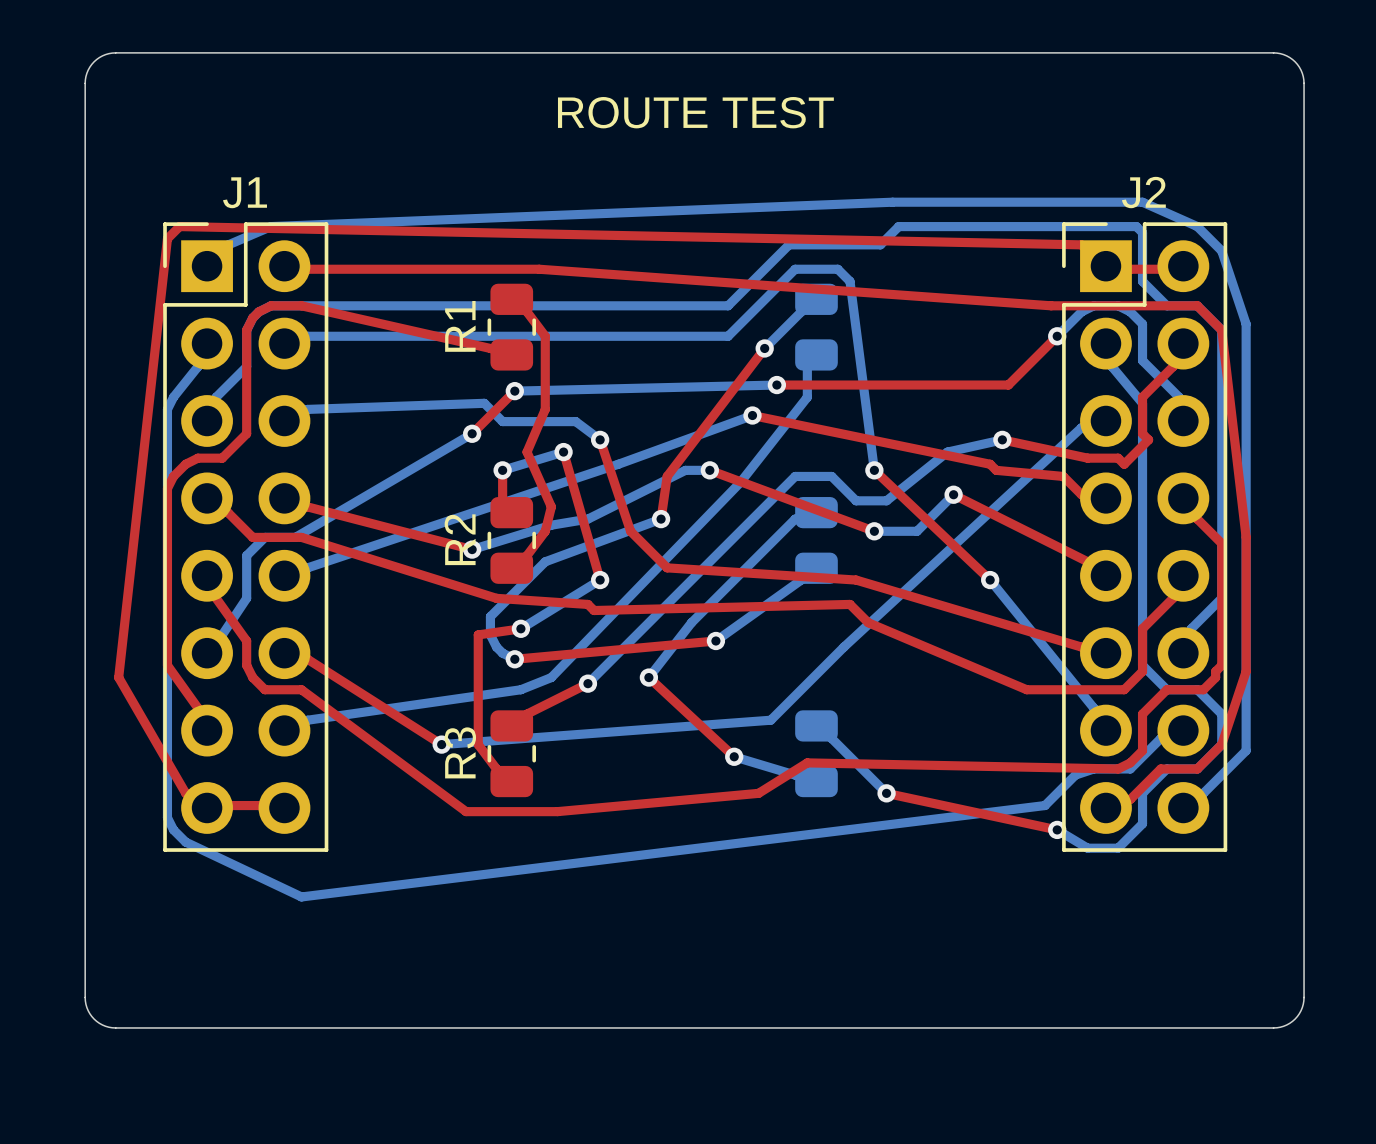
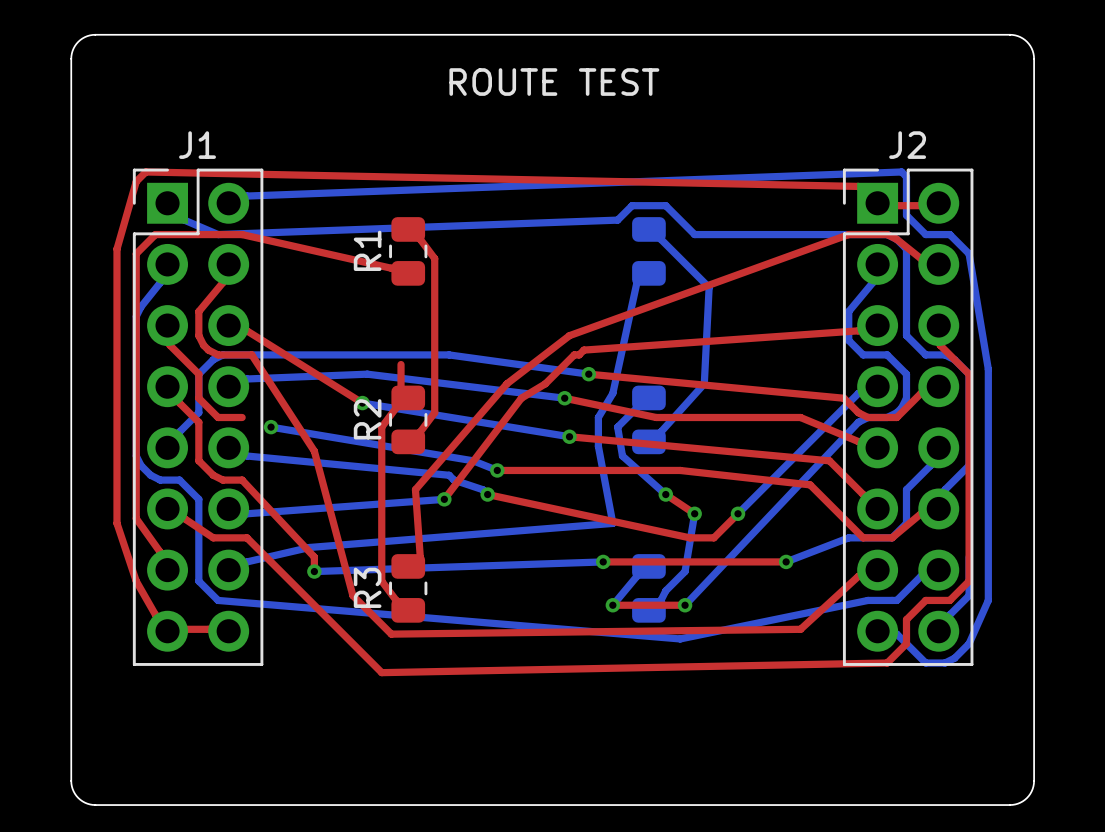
bottom track: (1136, 226) (898, 226) (880, 244) (789, 244) (728, 305) (271, 305) (258, 311) (252, 318) (246, 330) (246, 366) (216, 397) (207, 420) -> (901, 171) (246, 196) (228, 203)
top track: (167, 238) (118, 677) (185, 793) (207, 807) -> (136, 181) (116, 249) (116, 523) (136, 581) (155, 614) (167, 631)
bottom track: (207, 266) (228, 244) (271, 226) (892, 202) (1142, 202) (1197, 226) (1221, 250) (1246, 324) (1246, 476) -> none
top track: (284, 266) (307, 269) (539, 269) (1069, 305) -> (420, 557) (415, 489) (506, 383) (569, 335) (848, 234)
bottom track: (850, 281) (874, 470) -> none
bottom track: (776, 287) (728, 336) (307, 336) (284, 343) -> (617, 220) (218, 234) (184, 220) (167, 203)
bottom track: (816, 299) (764, 348) -> (648, 229) (709, 287) (704, 383) (660, 431) (648, 441)
top track: (271, 305) (258, 311) (252, 318) (246, 330) (246, 403) -> (228, 264) (222, 282) (198, 311)
bottom track: (1093, 305) (1081, 311) (1057, 336) -> (867, 234) (694, 234) (675, 215)
top track: (1118, 305) (1197, 305) (1221, 330) (1246, 537) (1246, 671) (1221, 744) -> (969, 518) (969, 581)
bottom track: (1221, 330) (1221, 482) -> (969, 253) (988, 369)
top track: (1057, 336) (1008, 385) (776, 385) -> none
via: (1057, 336) -> none
bottom track: (1105, 343) (1112, 366) (1142, 403) -> (906, 277) (906, 311)
bottom track: none -> (877, 264) (872, 282) (848, 311) (848, 340) (863, 354) (887, 354) (906, 374)
top track: (1183, 343) (1173, 366) (1142, 397) (1142, 433) (1148, 439) (1124, 464) (1118, 458) (1087, 458) (1002, 439) -> (938, 264) (920, 258) (896, 239) (887, 234)
top track: (764, 348) (667, 476) (661, 519) -> none
via: (764, 348) -> none
bottom track: (816, 354) (807, 366) (807, 397) (740, 482) (551, 677) (520, 689) (307, 720) -> (648, 273) (636, 282) (612, 393) (598, 417) (598, 446) (612, 523) (309, 547) (246, 561)
bottom track: (1142, 360) (1179, 397) (1183, 420) -> none
bottom track: (776, 385) (514, 391) -> none
via: (776, 385) -> none
top track: (514, 391) (472, 433) -> none
via: (514, 391) -> none
top track: (545, 409) (527, 452) (551, 506) (545, 531) -> (434, 316) (434, 412)
top track: (752, 415) (990, 464) (996, 470) (1063, 476) (1081, 494) (1105, 498) -> none
bottom track: (752, 415) (618, 464) (284, 575) -> (487, 494) (482, 489) (453, 480) (449, 475) (246, 456) (228, 447)
via: (752, 415) -> none
top track: none -> (228, 325) (246, 330) (362, 403)
bottom track: (284, 420) (307, 409) (484, 403) (502, 421) (575, 421) (600, 439) -> none
top track: none -> (877, 325) (858, 330) (583, 350) (579, 354) (574, 354) (545, 383) (521, 398) (444, 499)
bottom track: (1105, 420) (1081, 427) (843, 647) (770, 720) (441, 744) -> none
top track: (246, 433) (222, 458) (197, 458) (185, 464) (173, 476) (167, 488) -> (218, 234) (155, 234) (136, 253) (136, 378)
top track: none -> (198, 335) (203, 345) (218, 354) (251, 354) (314, 451) (352, 595) (391, 634) (800, 629) (858, 576) (877, 570)
bottom track: (472, 433) (295, 537) (264, 537) (246, 555) (246, 598) (222, 634) (207, 653) -> none
via: (472, 433) -> none
bottom track: (1142, 433) (1142, 482) -> (906, 335) (925, 354) (945, 354) (954, 359) (969, 374)
top track: (600, 439) (630, 531) (667, 567) (856, 580) (1105, 653) -> (569, 436) (829, 460) (877, 508)
via: (600, 439) -> none
bottom track: (1002, 439) (947, 452) (886, 500) (856, 500) (831, 476) (795, 476) (587, 683) -> none
via: (1002, 439) -> none
top track: (563, 452) (600, 580) -> none
bottom track: (563, 452) (502, 470) -> none
via: (563, 452) -> none
via: (502, 470) -> none
top track: (709, 470) (874, 531) -> none
bottom track: (709, 470) (685, 470) (587, 519) (551, 525) (472, 549) -> none
via: (709, 470) -> none
top track: (874, 470) (990, 580) -> none
via: (874, 470) -> none
top track: none -> (588, 374) (843, 398) (858, 412) (867, 417) (896, 417) (920, 393) (938, 386)
bottom track: none -> (588, 374) (449, 354) (222, 354) (213, 359) (198, 374) (198, 412) (179, 431) (167, 447)
via: none -> (588, 374)
top track: (953, 494) (1087, 561) (1105, 575) -> (564, 398) (656, 417) (800, 417) (877, 447)
bottom track: (953, 494) (917, 531) (874, 531) -> none
via: (953, 494) -> none
top track: (207, 498) (228, 513) (252, 537) (271, 537) -> (167, 325) (169, 345) (198, 374) (198, 398) (218, 417)
top track: none -> (167, 386) (179, 403) (198, 422) (198, 460) (213, 475) (222, 480) (242, 480) (314, 557) (314, 571)
top track: (284, 498) (307, 506) (472, 549) -> none
bottom track: none -> (228, 386) (246, 378) (367, 374) (564, 398)
bottom track: none -> (877, 386) (858, 393) (738, 513)
top track: (1183, 498) (1197, 519) (1221, 543) -> (938, 325) (940, 345) (969, 374) (969, 422)
bottom track: (816, 512) (795, 519) (691, 622) (648, 677) -> (648, 397) (617, 427) (622, 456) (665, 494)
via: none -> (564, 398)
bottom track: (1142, 513) (1142, 628) -> (938, 447) (930, 465) (906, 489)
bottom track: none -> (906, 398) (901, 407) (887, 417) (867, 417) (858, 422) (685, 605)
bottom track: none -> (362, 403) (569, 436)
via: none -> (362, 403)
bottom track: (661, 519) (545, 561) (490, 616) (490, 634) (496, 647) (502, 653) (514, 659) -> none
via: (661, 519) -> none
via: (874, 531) -> none
top track: (301, 537) (496, 598) (587, 604) (594, 610) (850, 604) (868, 622) (1026, 689) (1087, 689) -> (497, 470) (680, 470) (810, 484) (863, 537)
bottom track: none -> (271, 427) (473, 460) (497, 470)
via: none -> (271, 427)
via: (472, 549) -> none
via: none -> (569, 436)
bottom track: (816, 568) (715, 640) -> none
top track: (207, 575) (216, 598) (246, 640) (246, 665) (252, 677) (264, 689) -> (167, 508) (213, 537)
top track: (1183, 575) (1173, 598) (1142, 628) (1142, 671) (1124, 689) -> (938, 508) (920, 513) (892, 537)
bottom track: (600, 580) (520, 628) -> none
via: (600, 580) -> none
bottom track: (990, 580) (1093, 708) (1105, 730) -> none
via: (990, 580) -> none
bottom track: (167, 586) (167, 817) (173, 829) (185, 842) (301, 896) (1045, 805) (1075, 775) (1093, 768) -> (136, 456) (141, 465) (150, 475) (160, 480) (179, 480) (198, 499) (198, 581) (218, 600) (680, 638) (867, 600)
via: none -> (497, 470)
top track: (520, 628) (478, 634) -> (408, 397) (396, 407) (381, 427) (381, 494)
via: (520, 628) -> none
top track: none -> (487, 494) (689, 537) (713, 537) (738, 513)
via: none -> (487, 494)
top track: none -> (665, 494) (694, 513)
via: none -> (665, 494)
bottom track: none -> (444, 499) (246, 513) (228, 508)
via: none -> (444, 499)
top track: (715, 640) (514, 659) -> none
via: (715, 640) -> none
top track: (284, 653) (307, 659) (441, 744) -> none
via: (514, 659) -> none
via: none -> (694, 513)
via: none -> (738, 513)
bottom track: (1142, 665) (1166, 689) (1197, 689) (1221, 714) -> (906, 518) (906, 523) (892, 537) (848, 537) (786, 561)
top track: (1221, 665) (1215, 671) (1215, 677) (1203, 689) (1166, 689) (1142, 714) (1142, 750) (1130, 762) (1118, 768) (807, 762) (758, 793) (557, 811) (466, 811) (301, 689) -> (925, 600) (906, 619) (906, 643) (887, 663) (381, 672) (246, 537) (242, 537)
top track: (648, 677) (734, 756) -> none
via: (648, 677) -> none
top track: (587, 683) (527, 714) -> none
via: (587, 683) -> none
top track: none -> (603, 561) (786, 561)
bottom track: none -> (603, 561) (314, 571)
via: none -> (603, 561)
via: none -> (786, 561)
bottom track: (816, 725) (831, 738) (886, 793) -> (648, 566) (636, 576) (612, 605)
via position: (441, 744) -> (314, 571)
bottom track: (1221, 744) (1197, 768) (1166, 768) (1142, 793) (1142, 823) (1118, 848) (1087, 848) (1057, 829) -> none
bottom track: (1246, 750) (1203, 793) (1183, 807) -> (969, 581) (969, 595) (949, 614) (938, 631)
bottom track: none -> (988, 585) (988, 600) (969, 643) (954, 658) (945, 663) (925, 663) (896, 634) (877, 631)
bottom track: (734, 756) (816, 781) -> (694, 513) (685, 571) (665, 590) (660, 600) (648, 610)
via: (734, 756) -> none
top track: (1166, 768) (1160, 768) (1130, 799) (1105, 807) -> none
top track: none -> (612, 605) (685, 605)
via: none -> (612, 605)
top track: (886, 793) (1057, 829) -> none
via position: (886, 793) -> (685, 605)
via: (1057, 829) -> none

